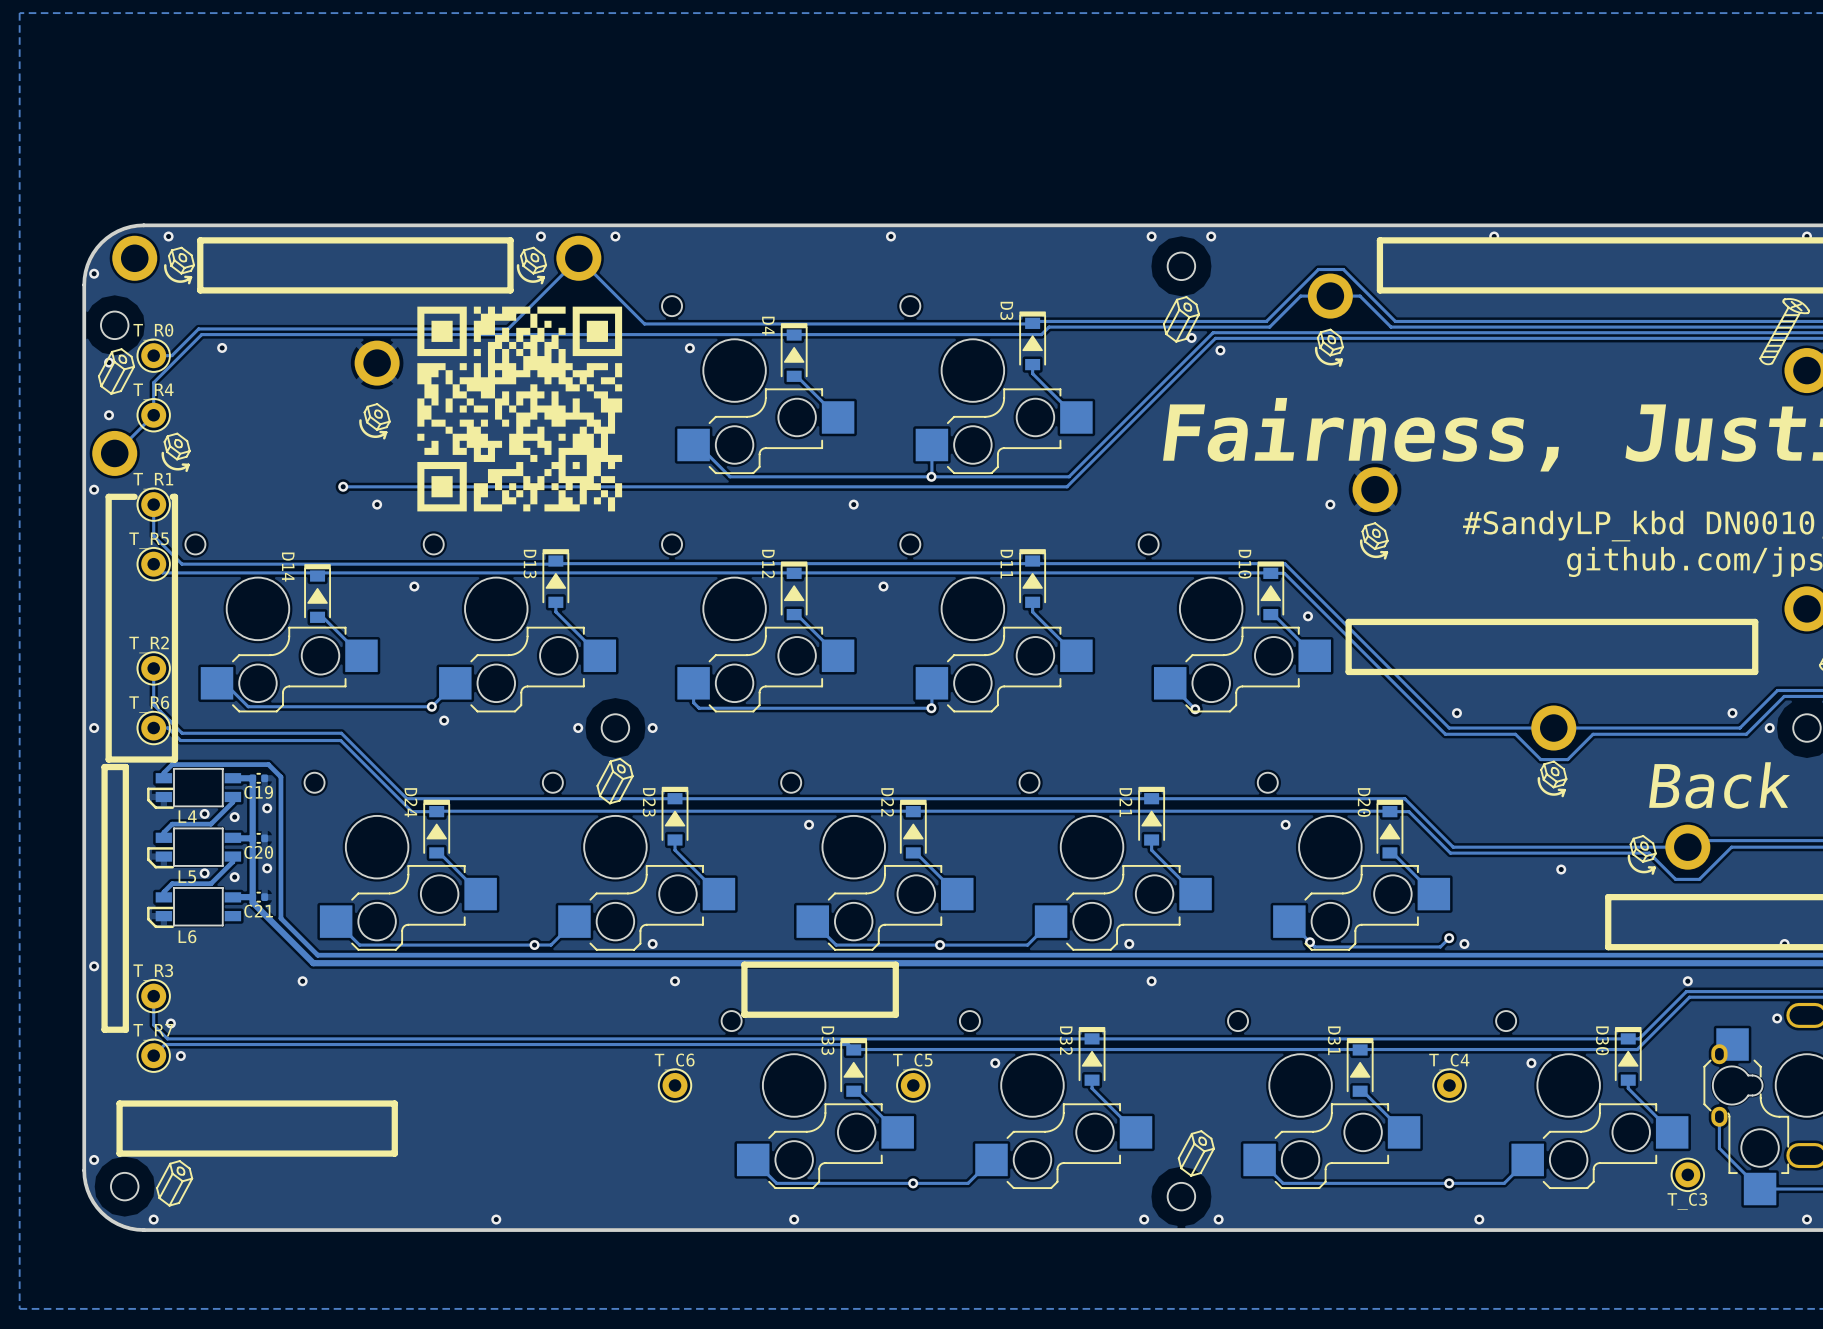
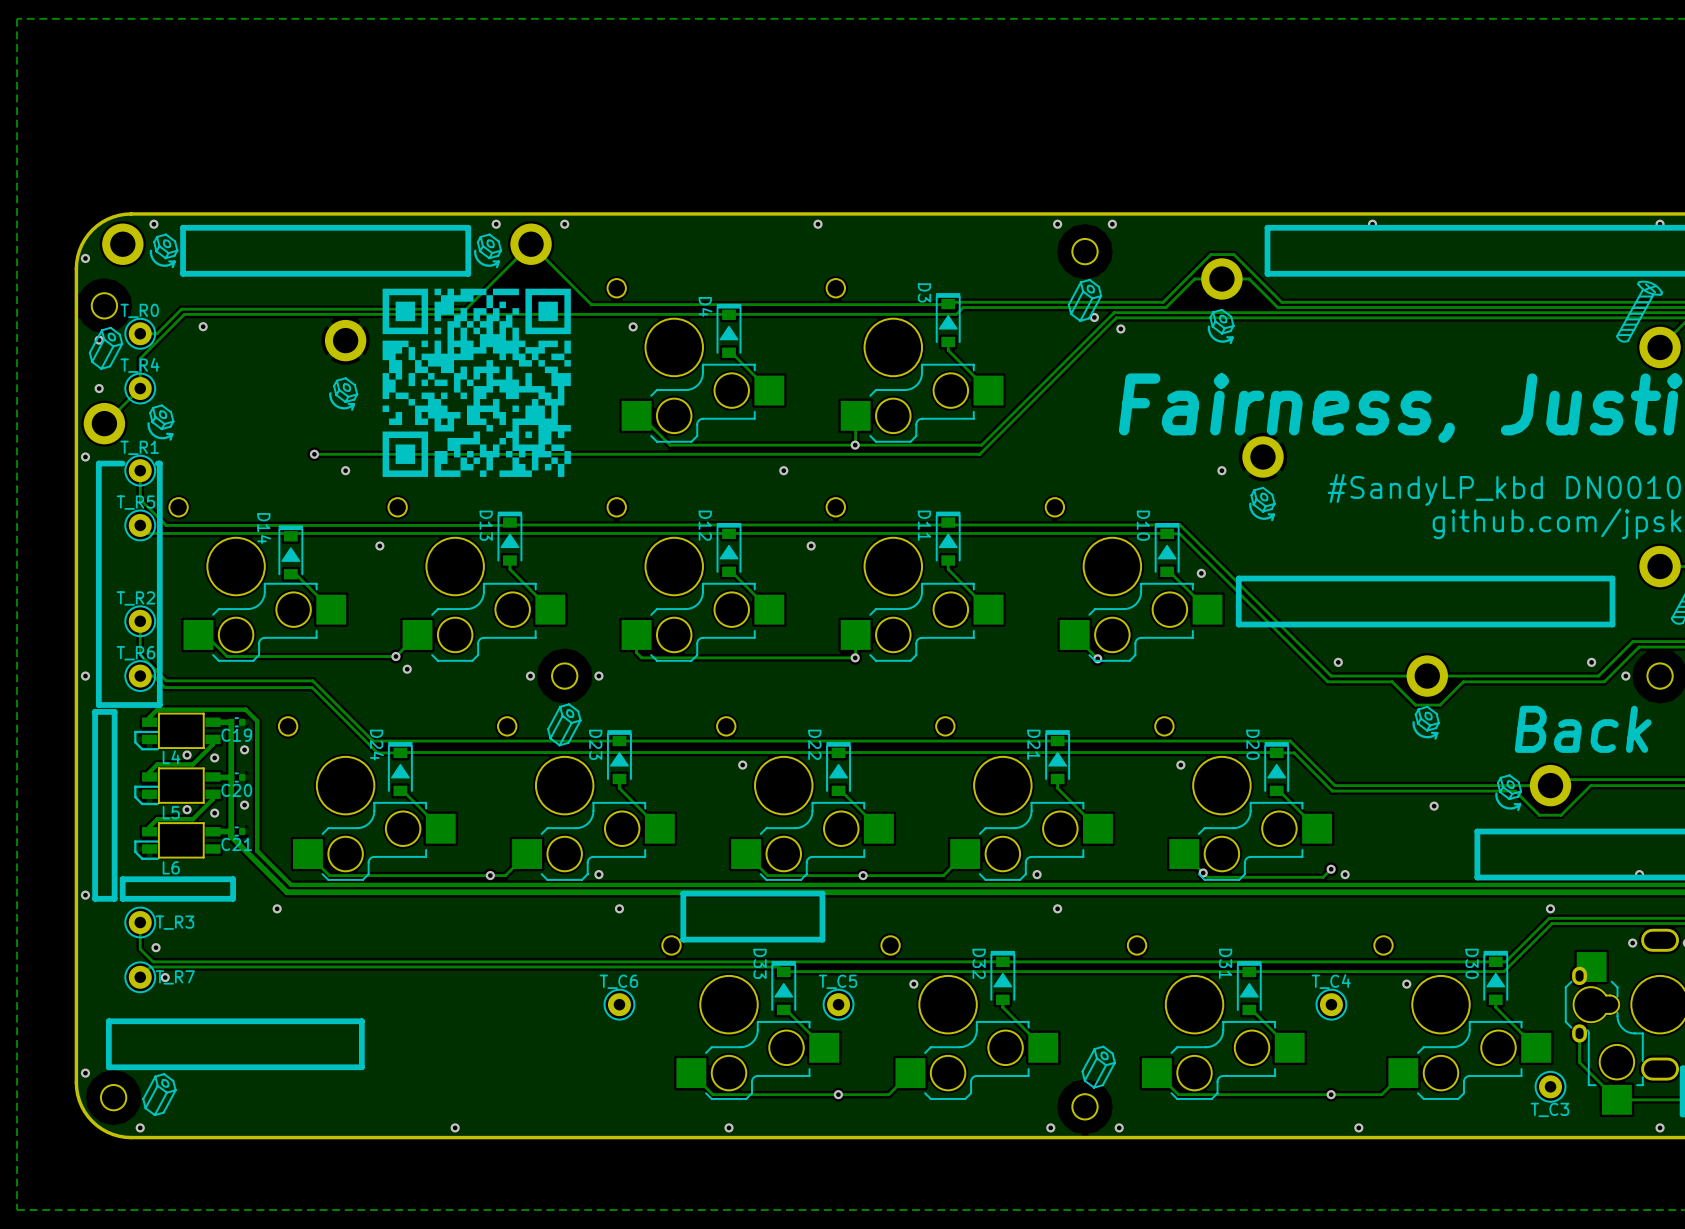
line: none -> (233, 879) (122, 879) (122, 898) (233, 898) (233, 879)
line: (125, 970) (125, 1029) (104, 1029) (104, 970) -> (114, 898) (95, 898)
T_R3 name position: T_R3 (153, 972) -> T_R3 (175, 922)
T_R7 name position: T_R7 (153, 1032) -> T_R7 (175, 977)

